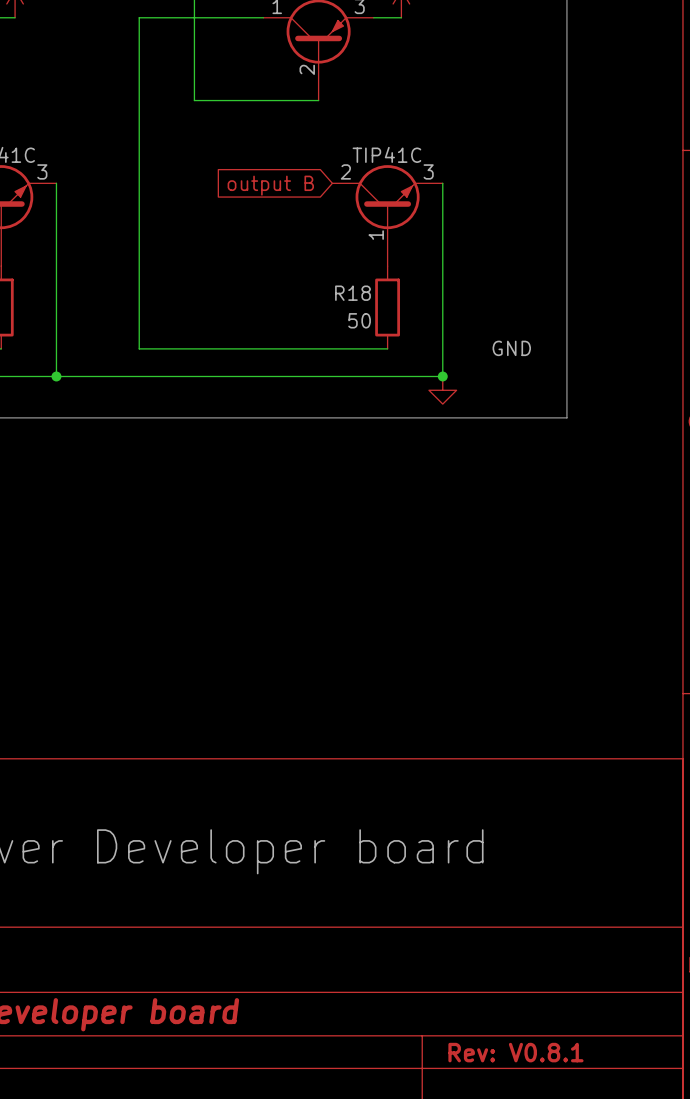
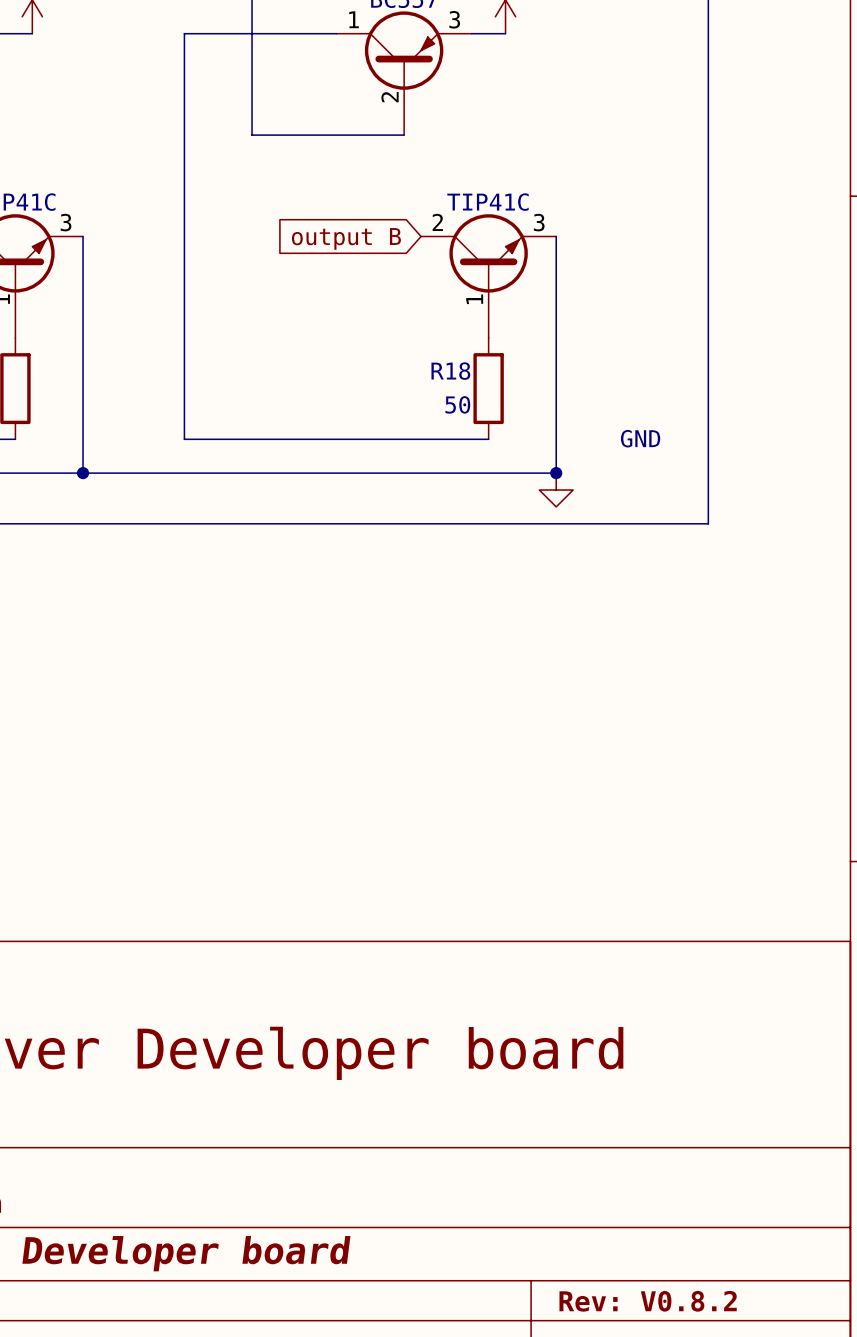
title block: Rev: V0.8.1 (515, 1052) -> Rev: V0.8.2 (648, 1301)

